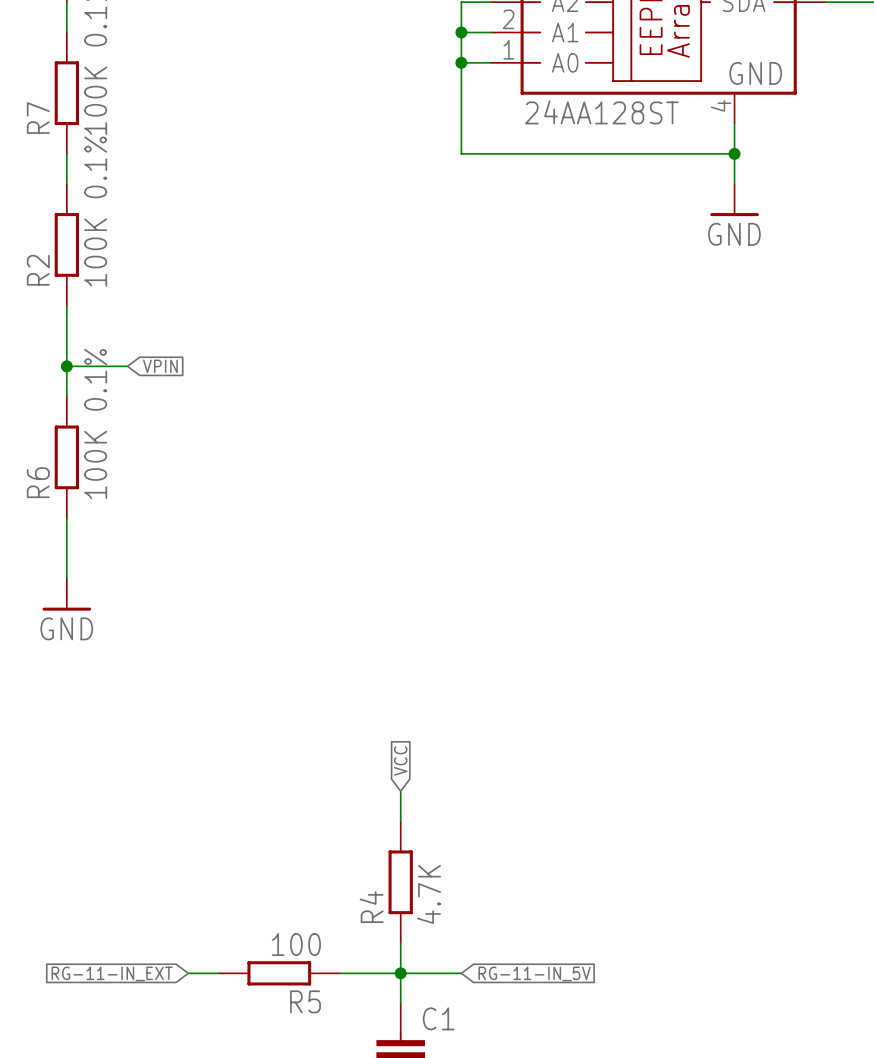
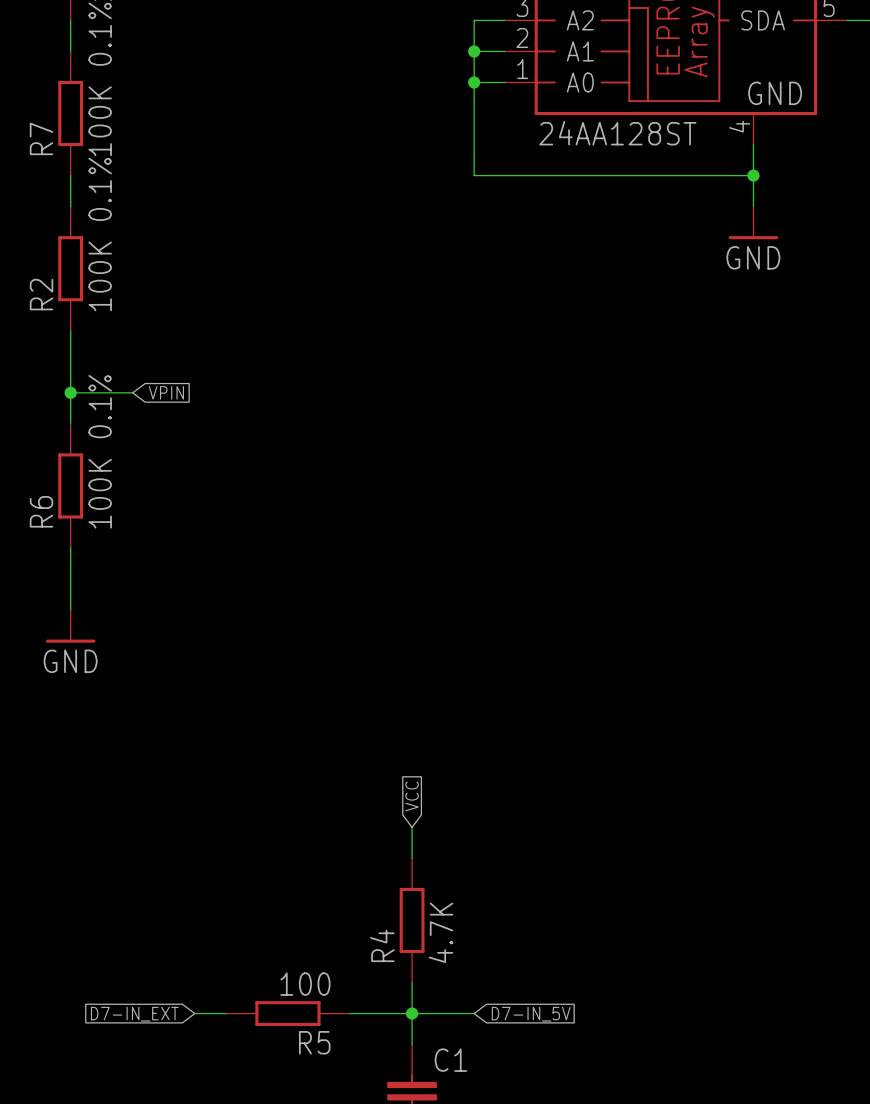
global label: RG-11-IN_EXT (112, 973) -> D7-IN_EXT (134, 1014)
global label: RG-11-IN_5V (534, 973) -> D7-IN_5V (531, 1014)

